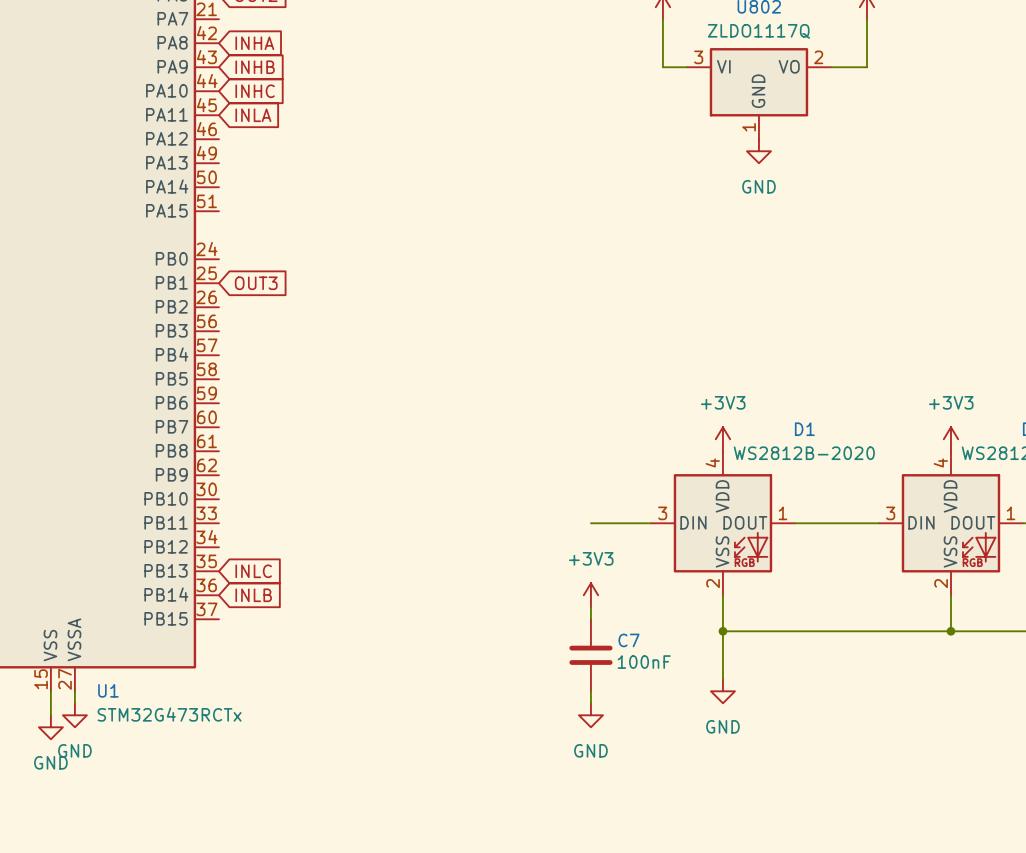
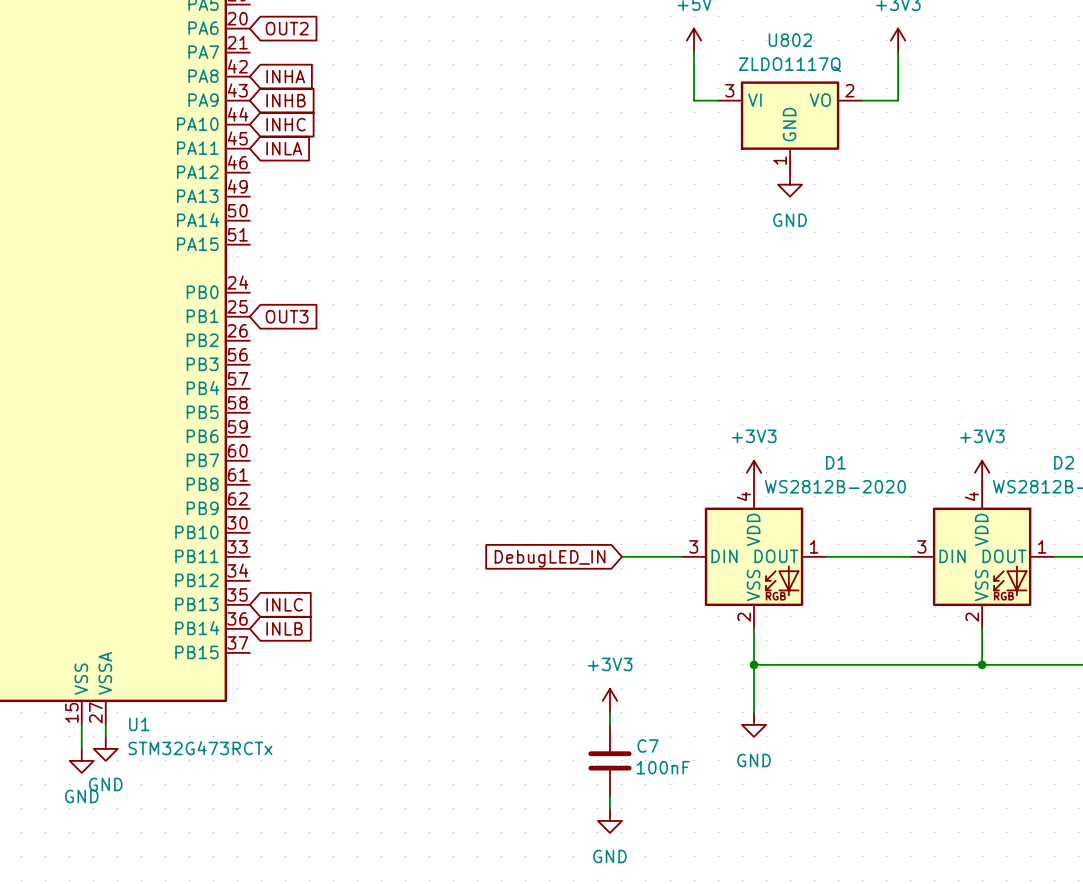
global label: none -> DebugLED_IN (550, 558)
power symbol position: +3V3 (590, 595) -> +3V3 (609, 700)
wire: (590, 607) (590, 619) -> (609, 712) (609, 724)
C7 position: (590, 655) -> (609, 760)
wire: (590, 691) (590, 703) -> (609, 796) (609, 808)
power symbol position: GND (590, 715) -> GND (609, 820)

